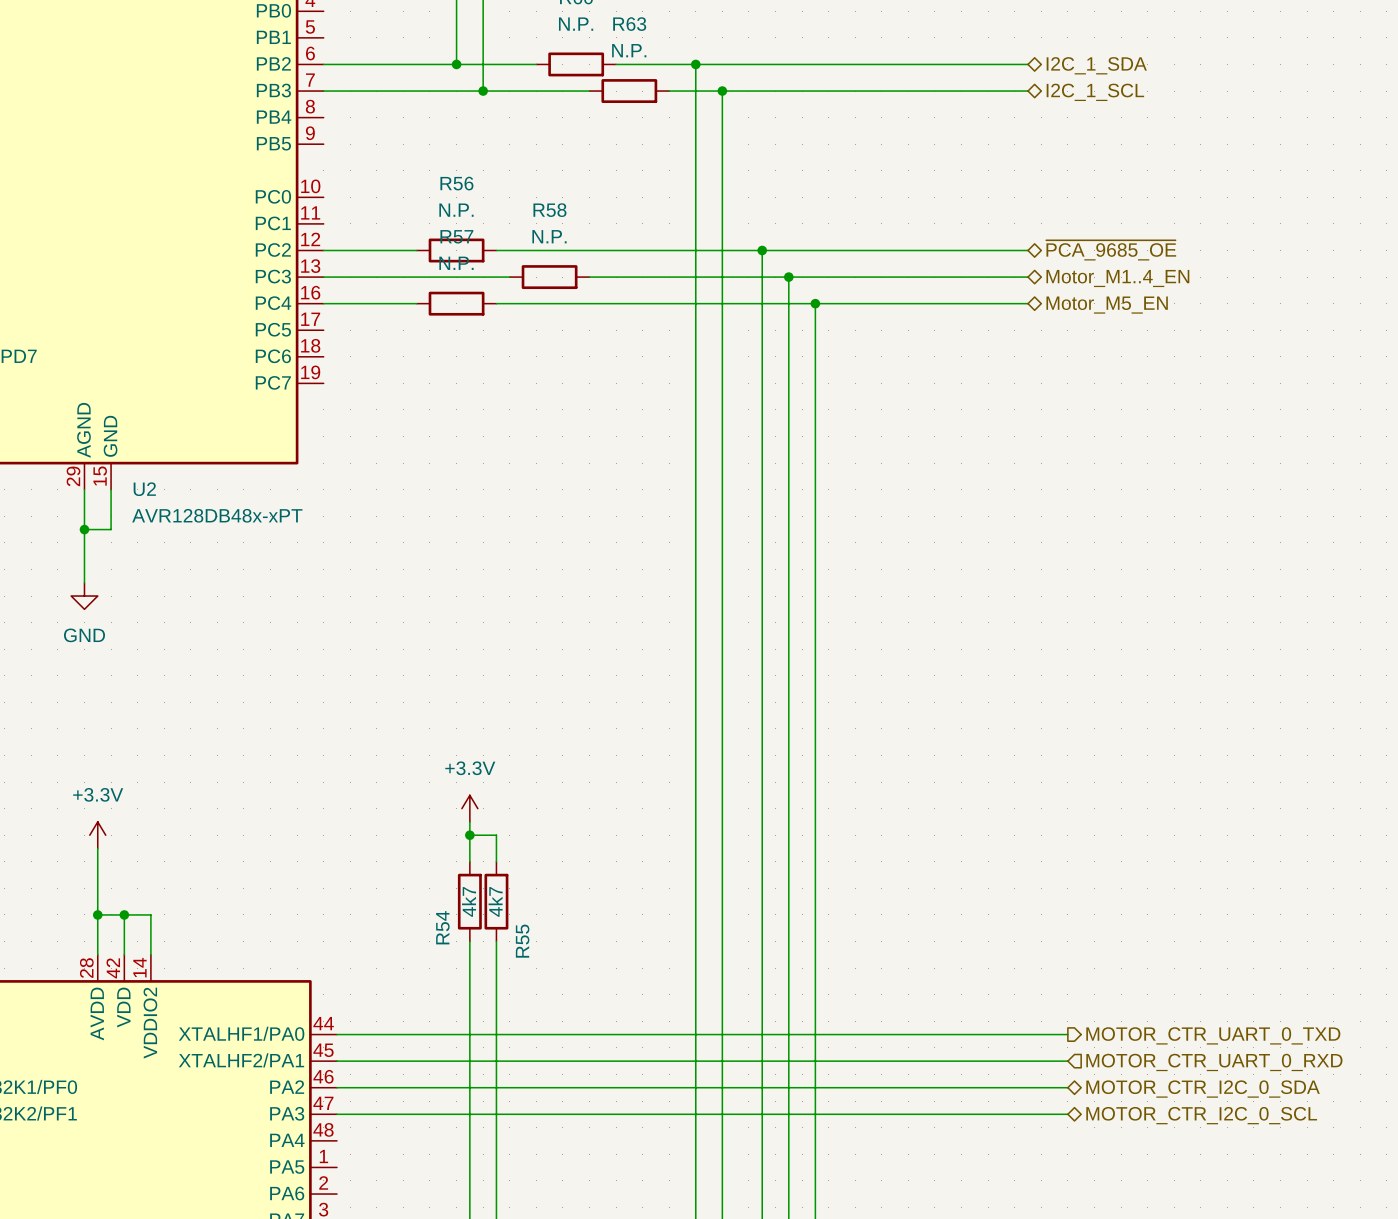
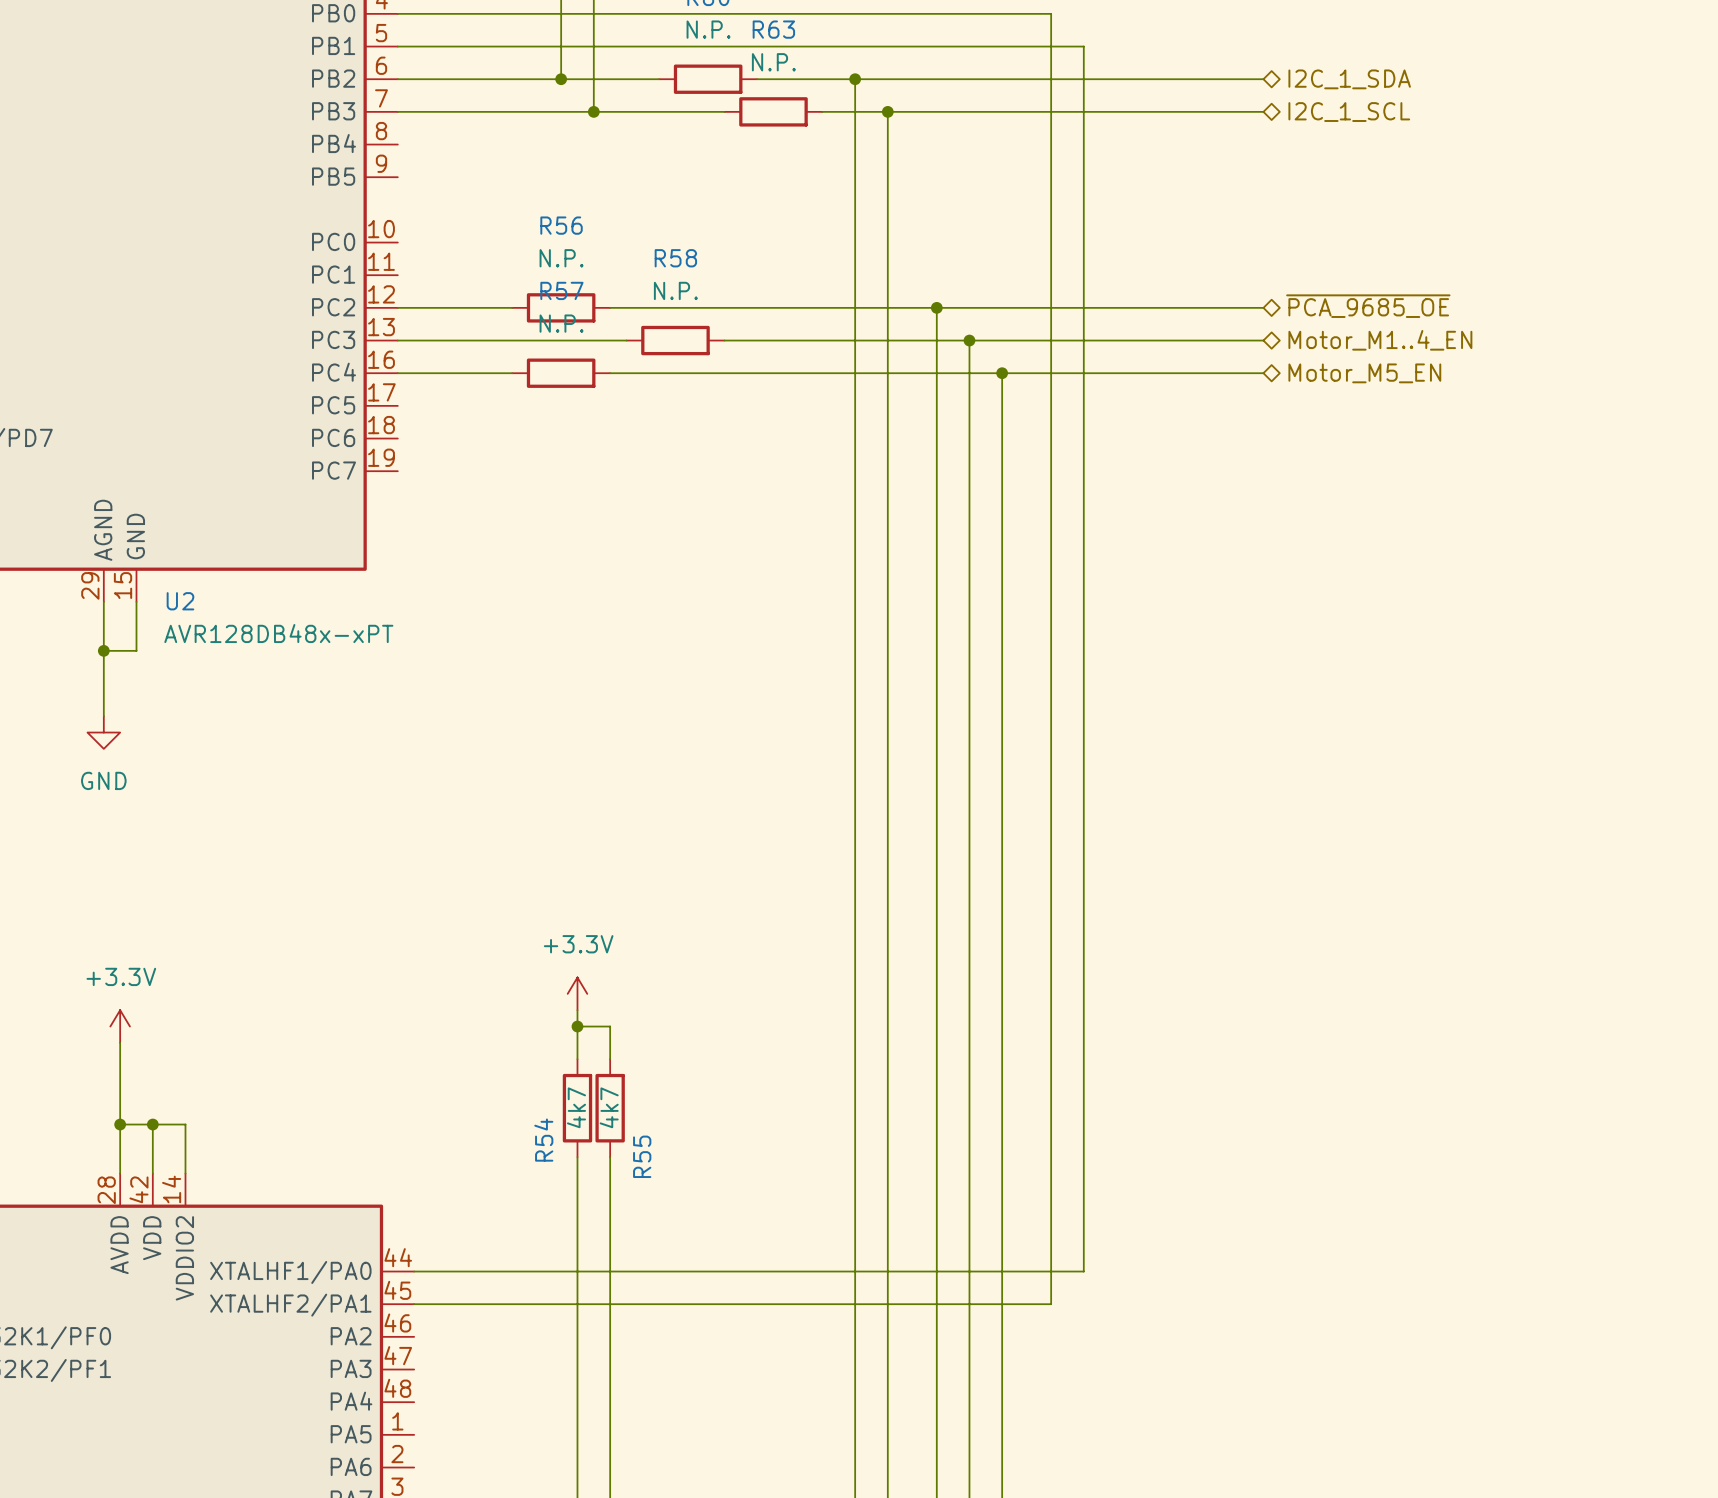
wire: (881, 1034) (1067, 1034) -> (1083, 1271) (1083, 46) (397, 46)
hierarchical label: MOTOR_CTR_UART_0_TXD (1213, 1035) -> none
wire: (855, 1061) (1067, 1061) -> (1051, 1304) (1051, 13) (397, 13)
hierarchical label: MOTOR_CTR_UART_0_RXD (1214, 1062) -> none
wire: (336, 1087) (1067, 1087) -> none
hierarchical label: MOTOR_CTR_I2C_0_SDA (1203, 1089) -> none
wire: (336, 1114) (1067, 1114) -> none
hierarchical label: MOTOR_CTR_I2C_0_SCL (1201, 1115) -> none

